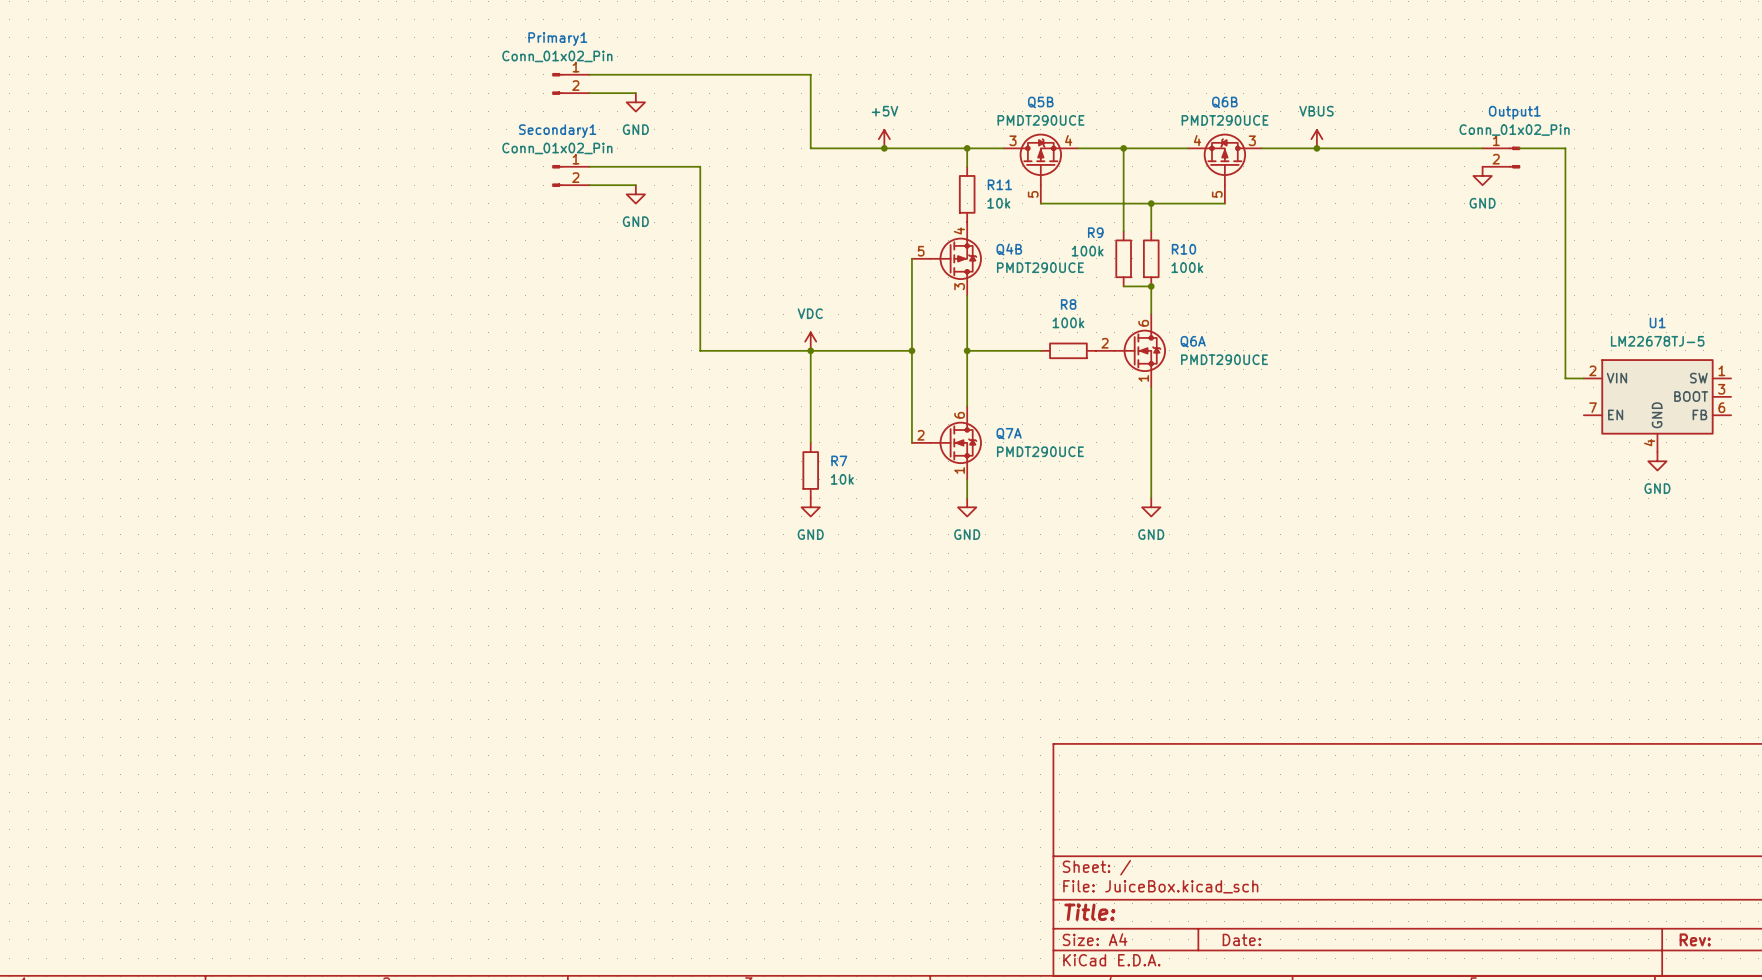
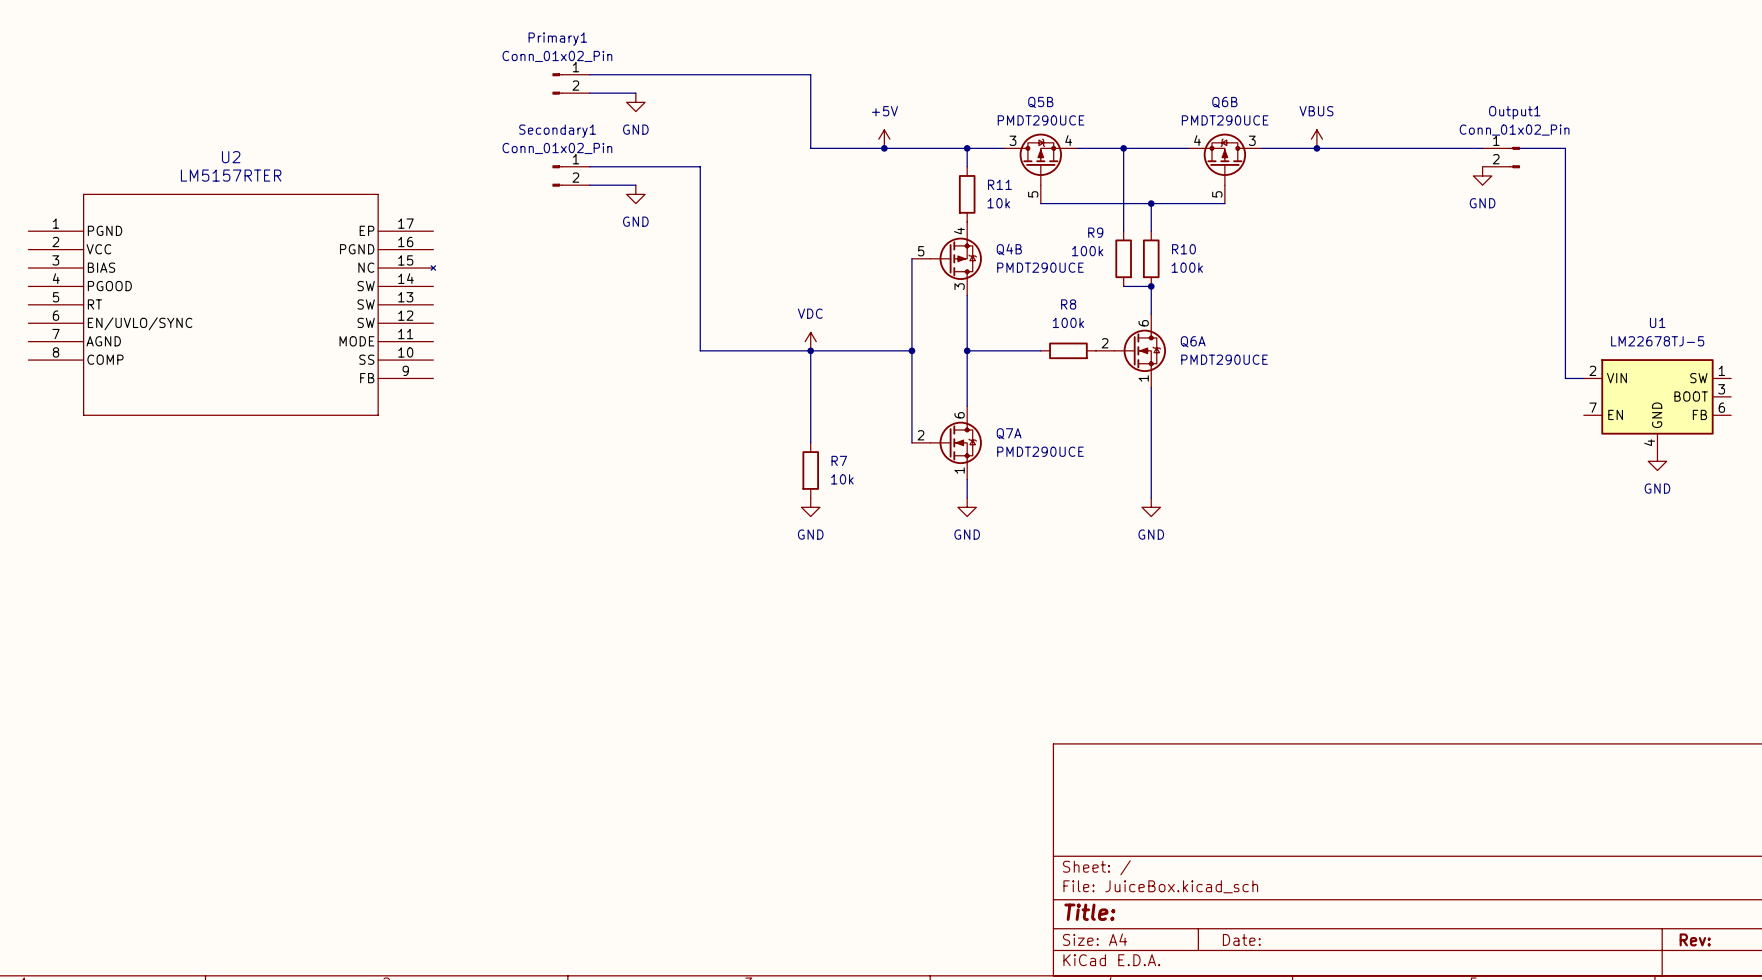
U2: none -> LM5157RTER (231, 304)

